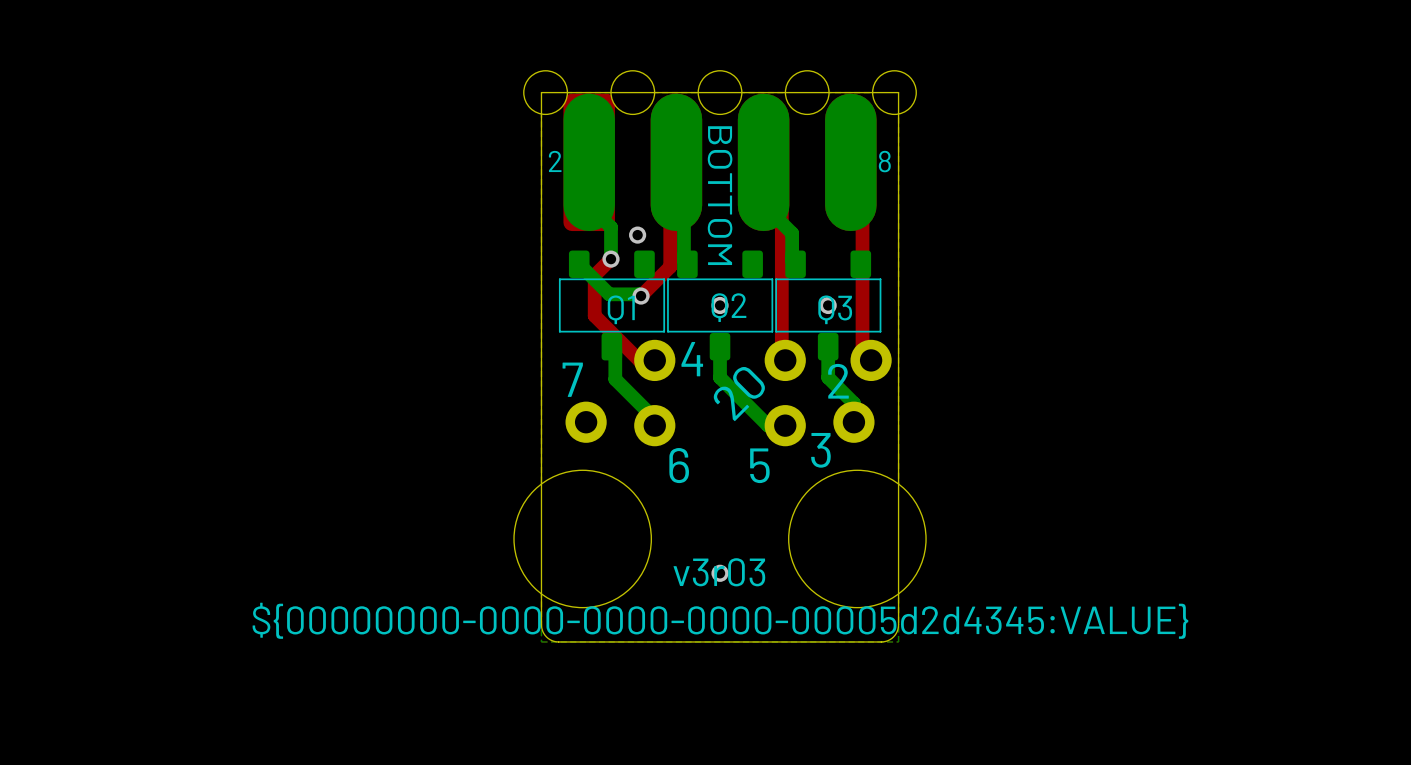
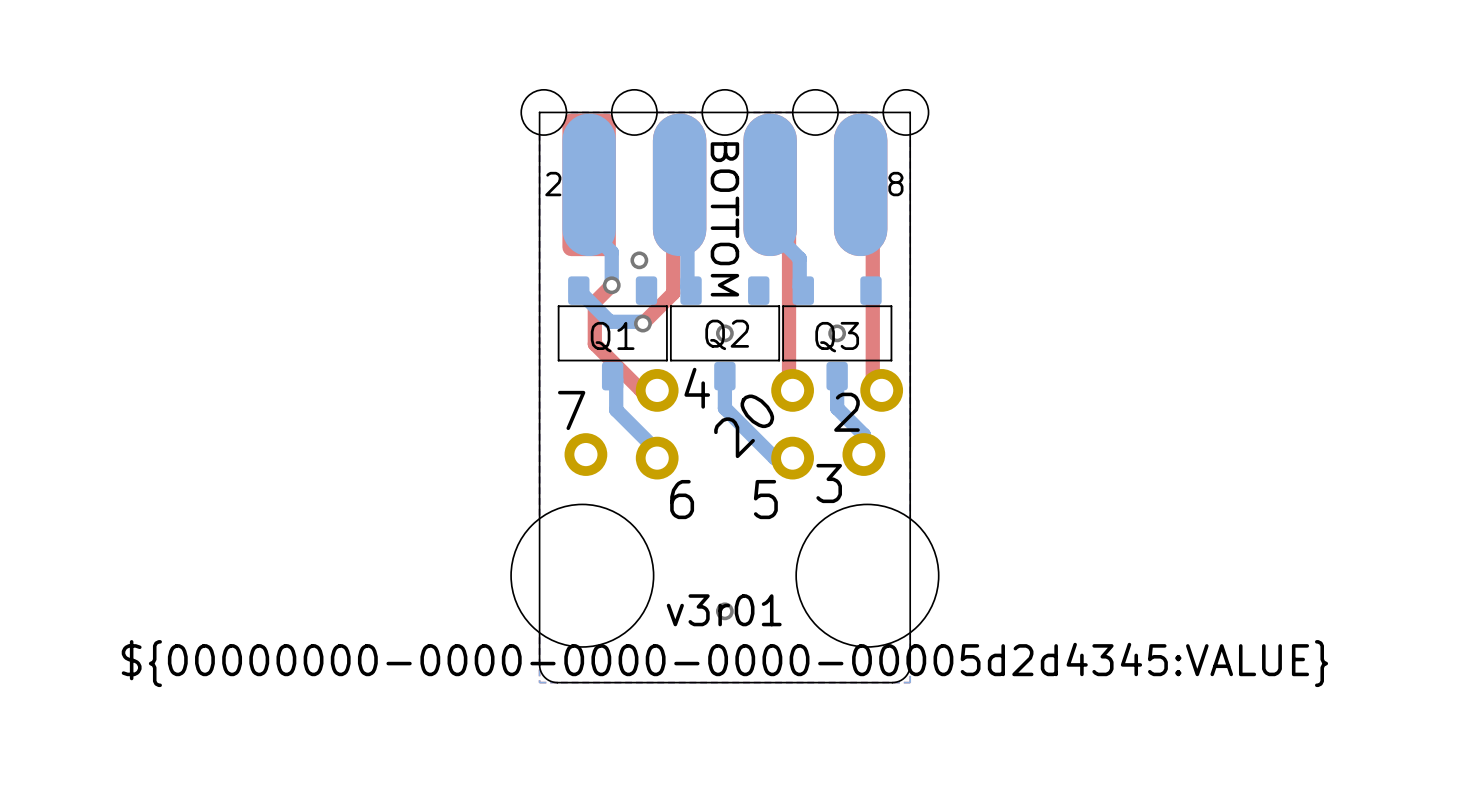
text: v3r03 (719, 572) -> v3r01 (724, 610)

